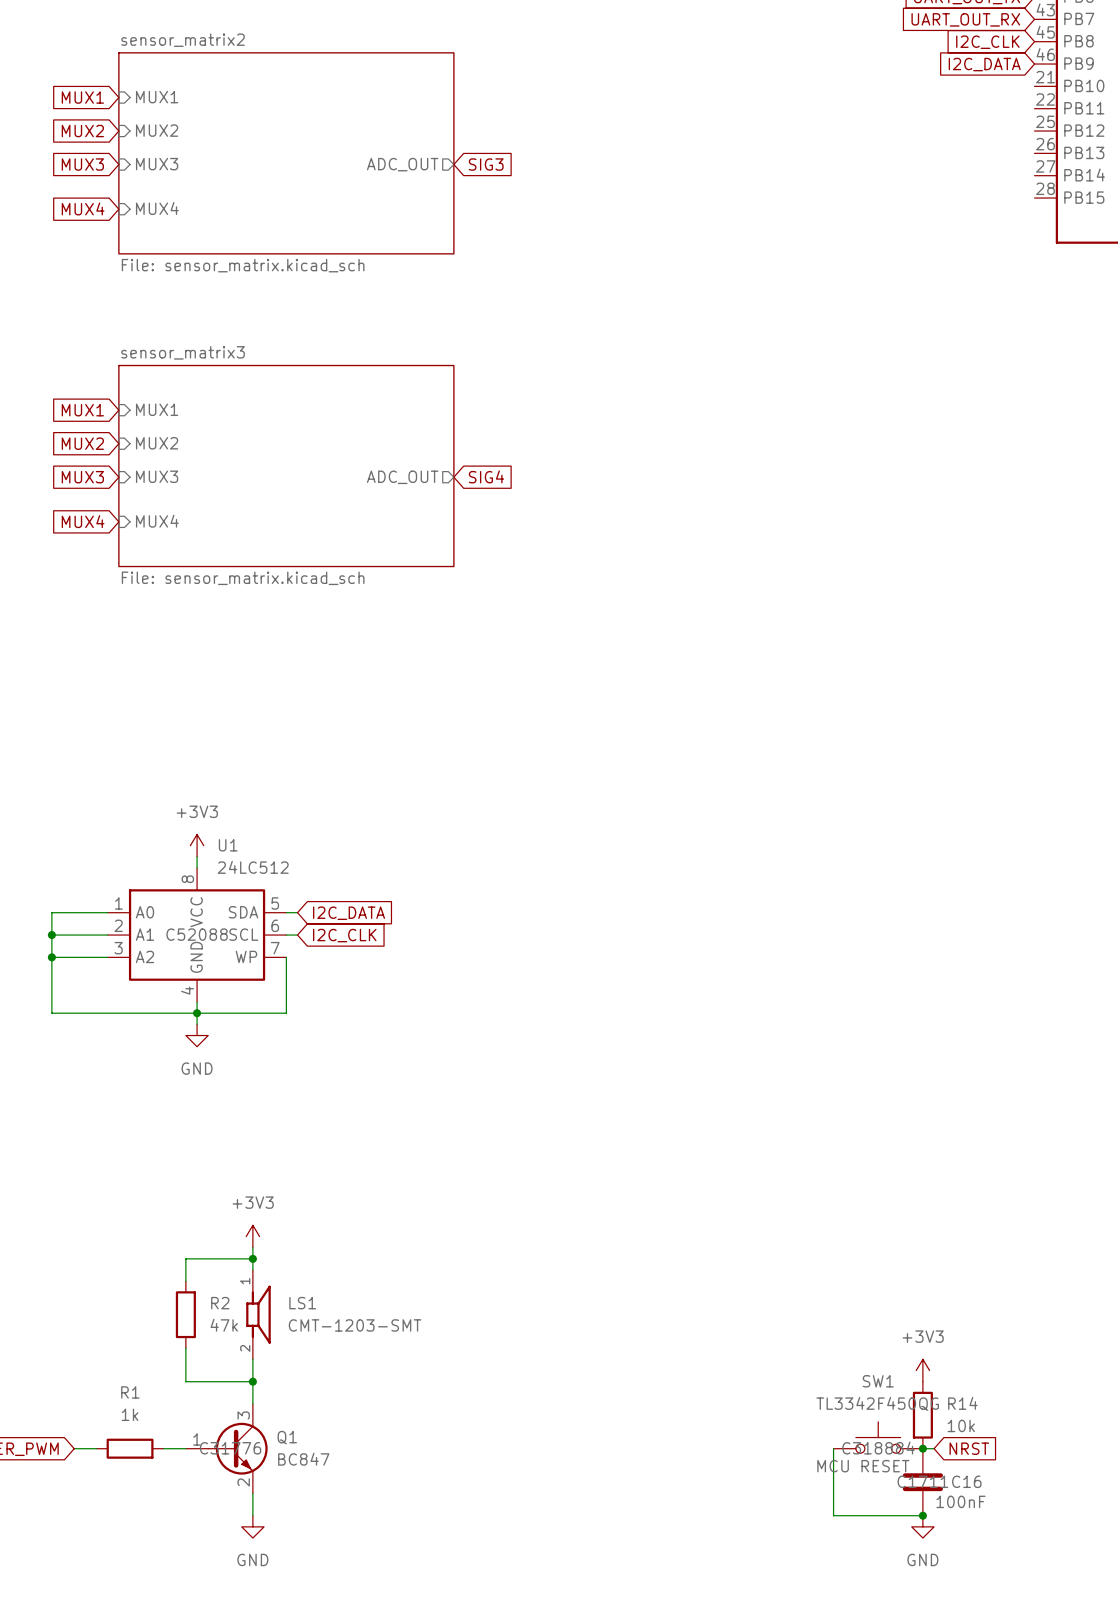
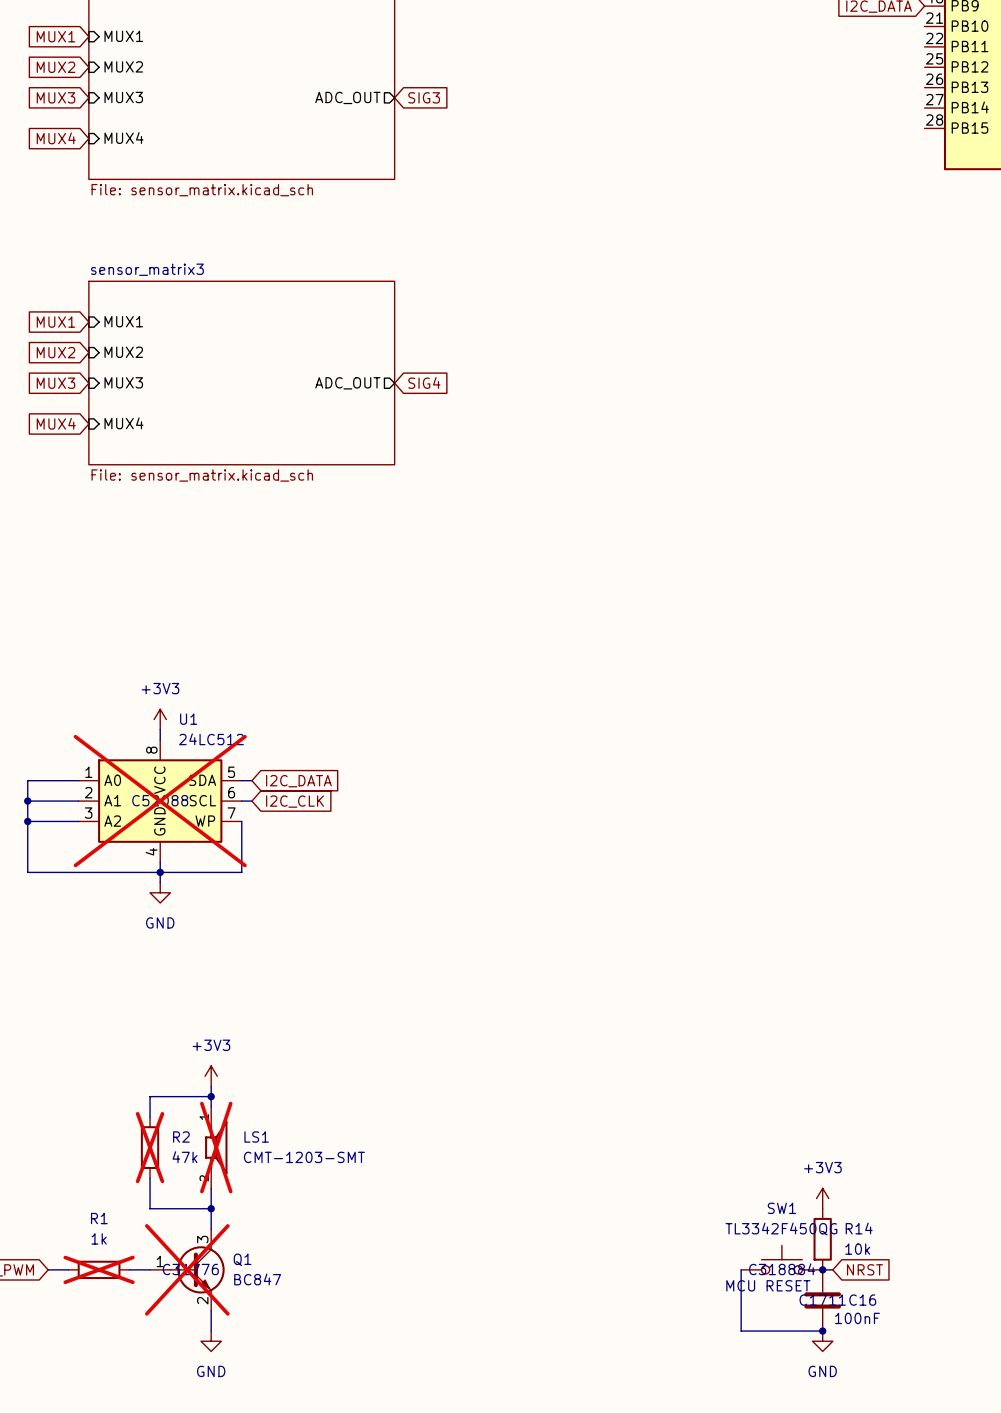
U1 do-not-place cross: none -> (160, 801)
R2 do-not-place cross: none -> (150, 1147)
LS1 do-not-place cross: none -> (216, 1147)
R1 do-not-place cross: none -> (99, 1269)
Q1 do-not-place cross: none -> (187, 1269)

